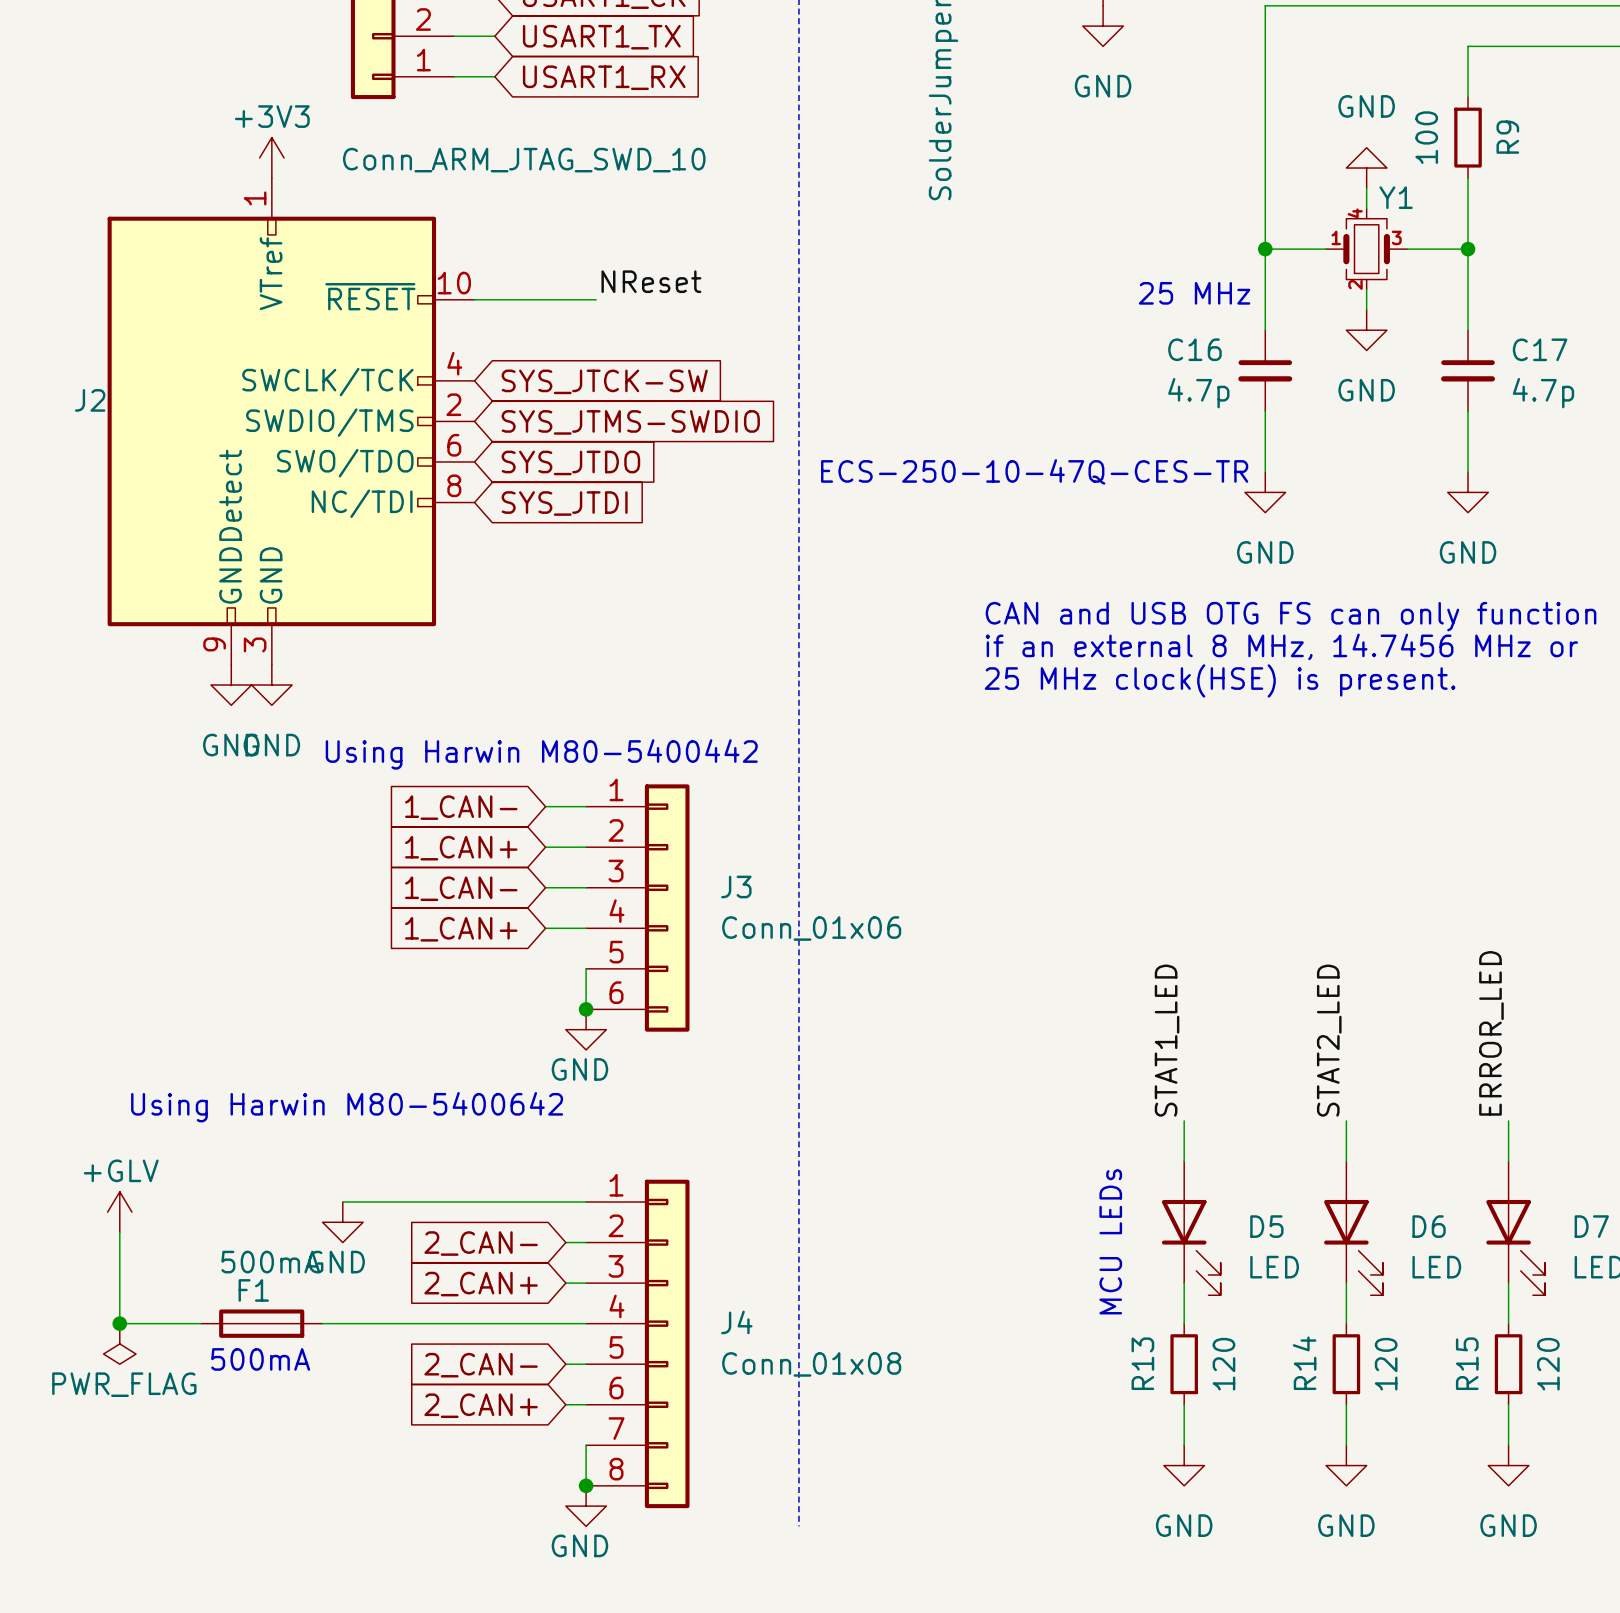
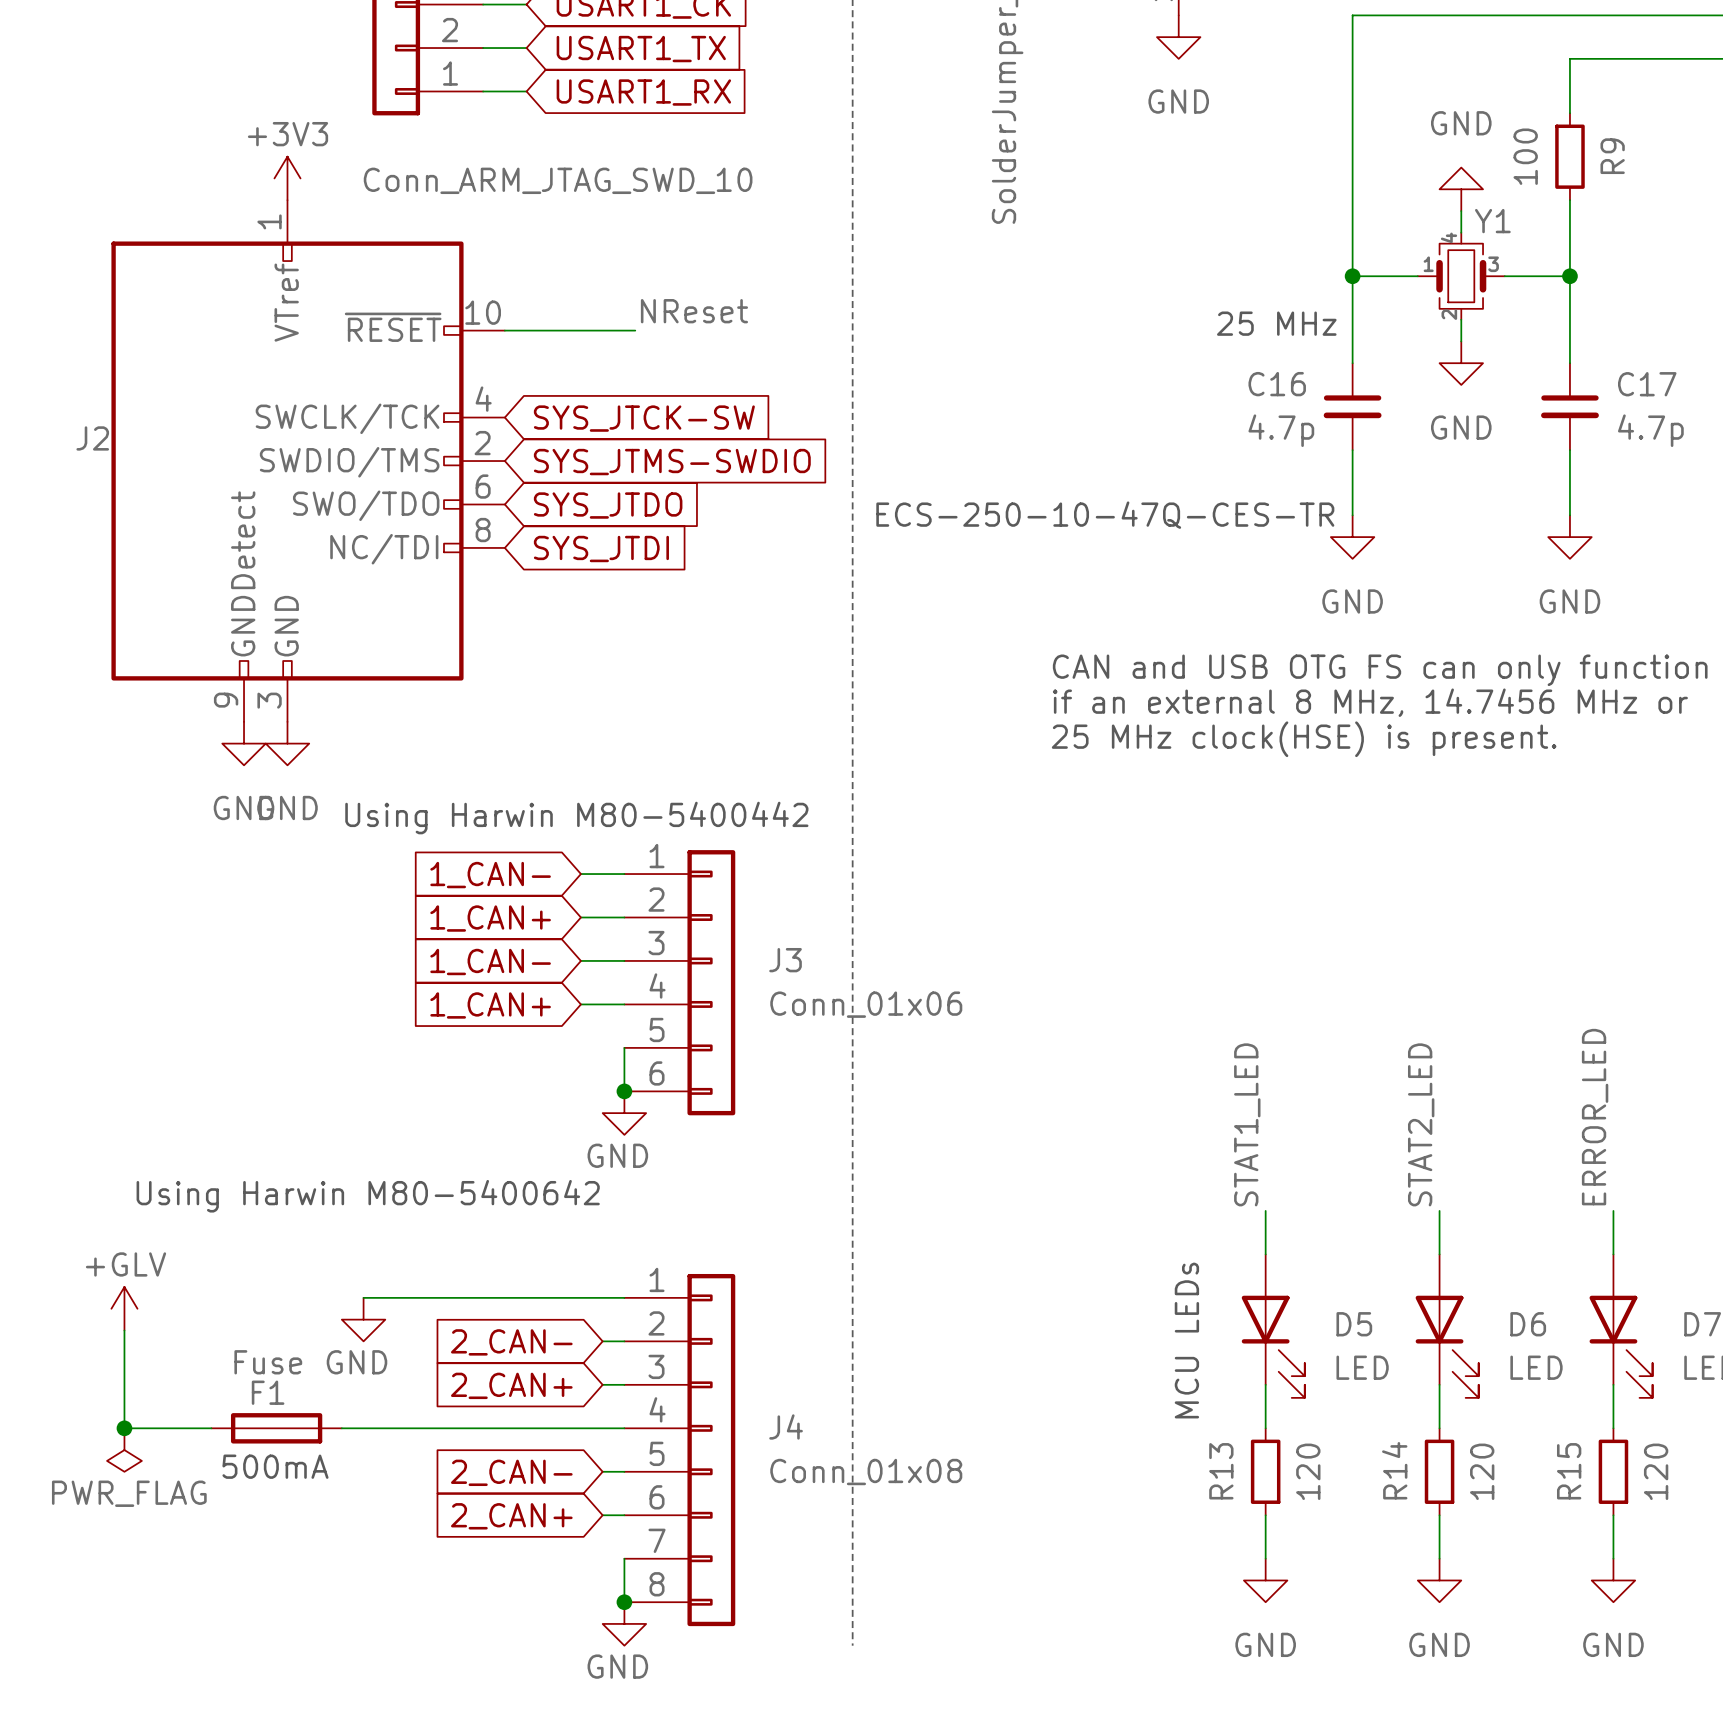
F1 value: 500mA (270, 1262) -> Fuse (268, 1362)

